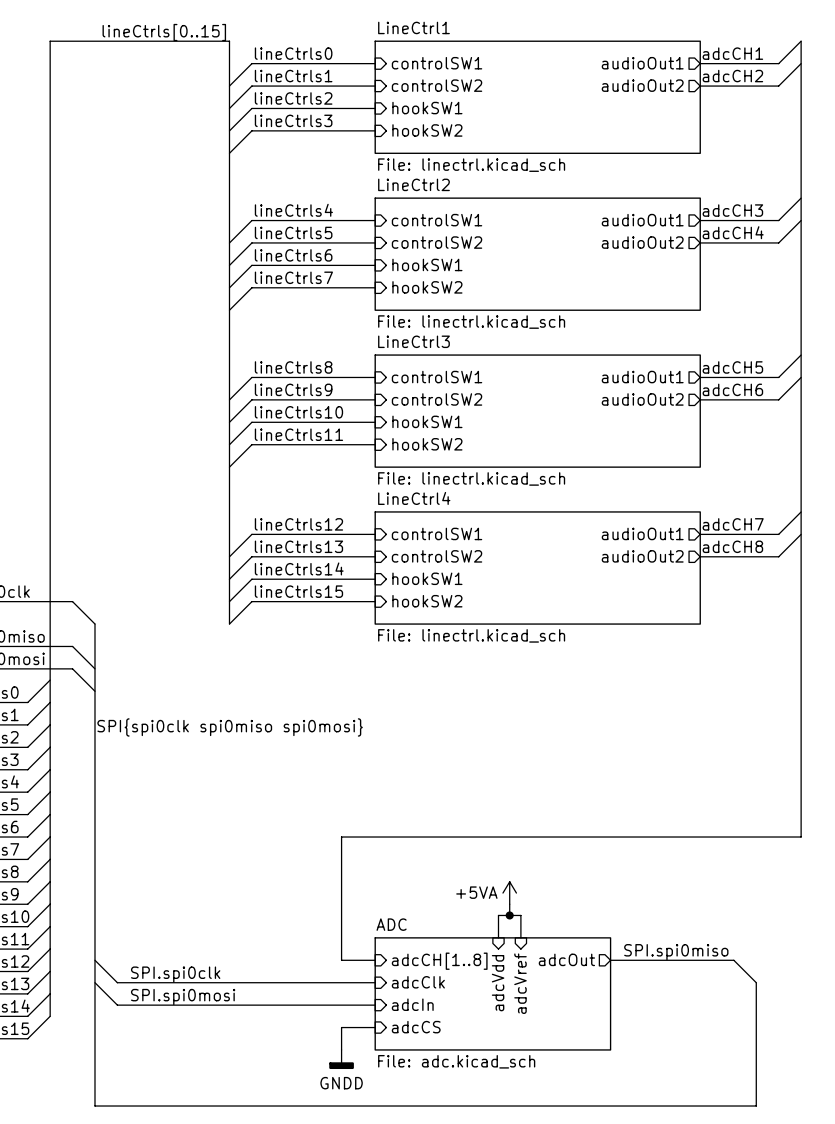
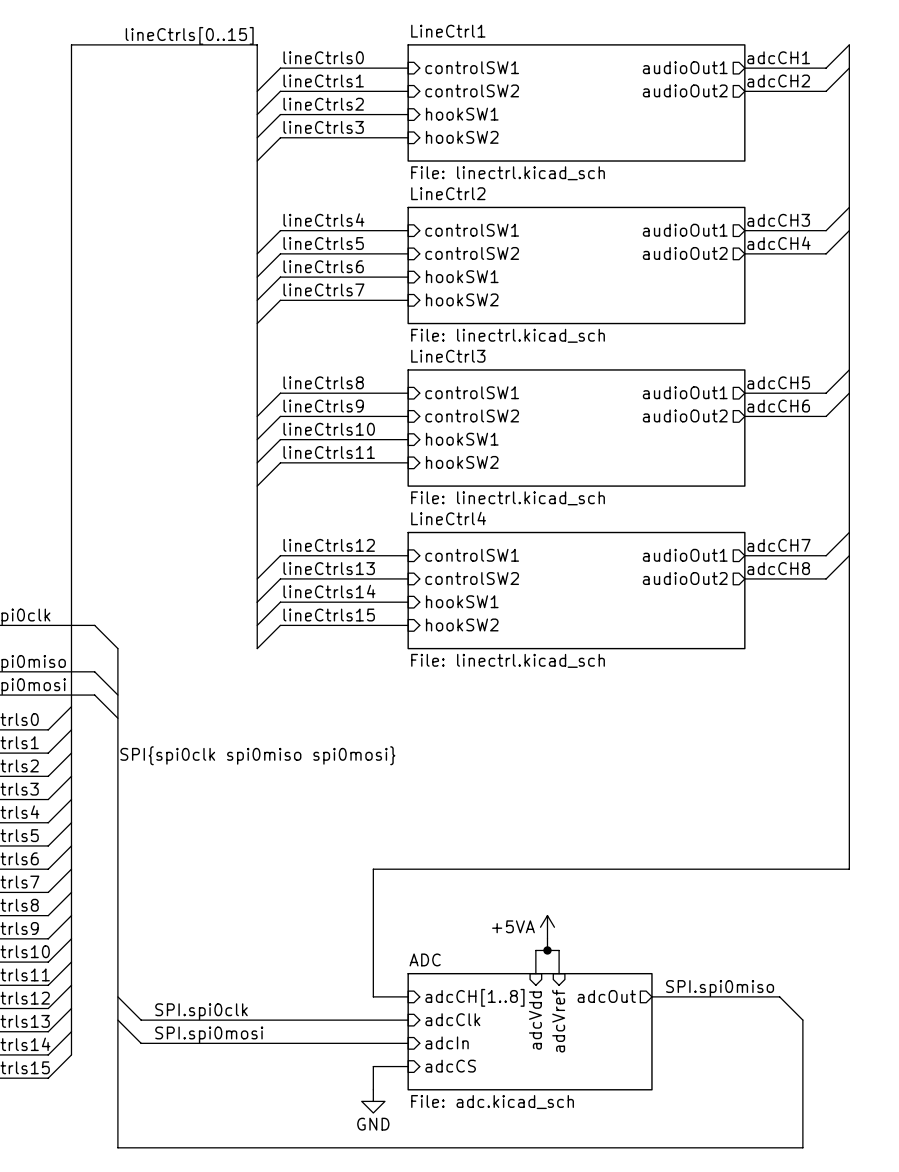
power symbol: GNDD (341, 1059) -> GND (373, 1101)

